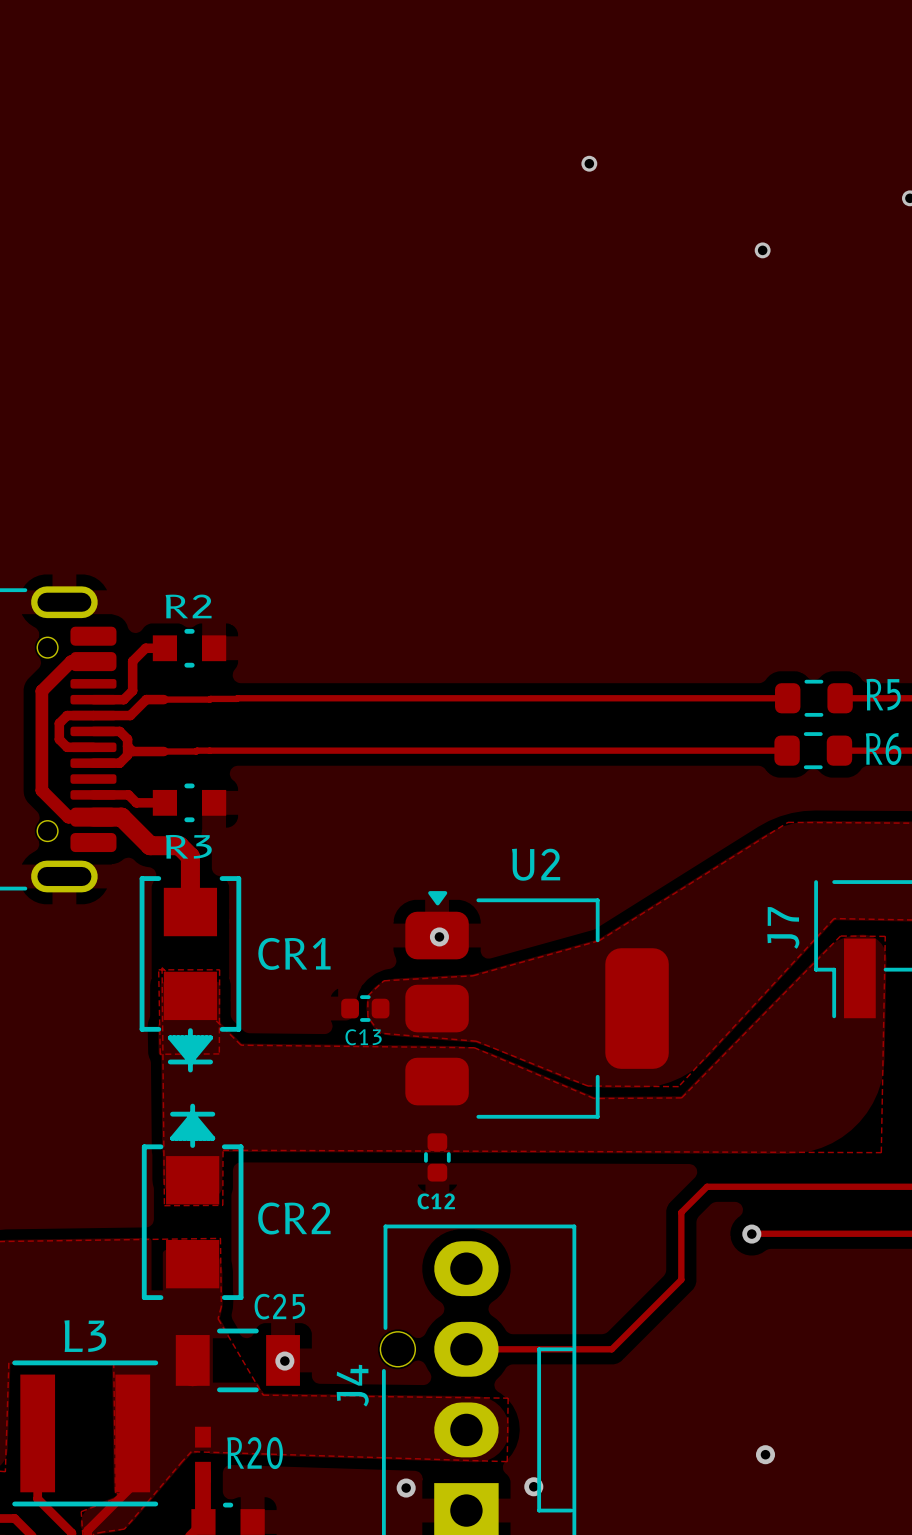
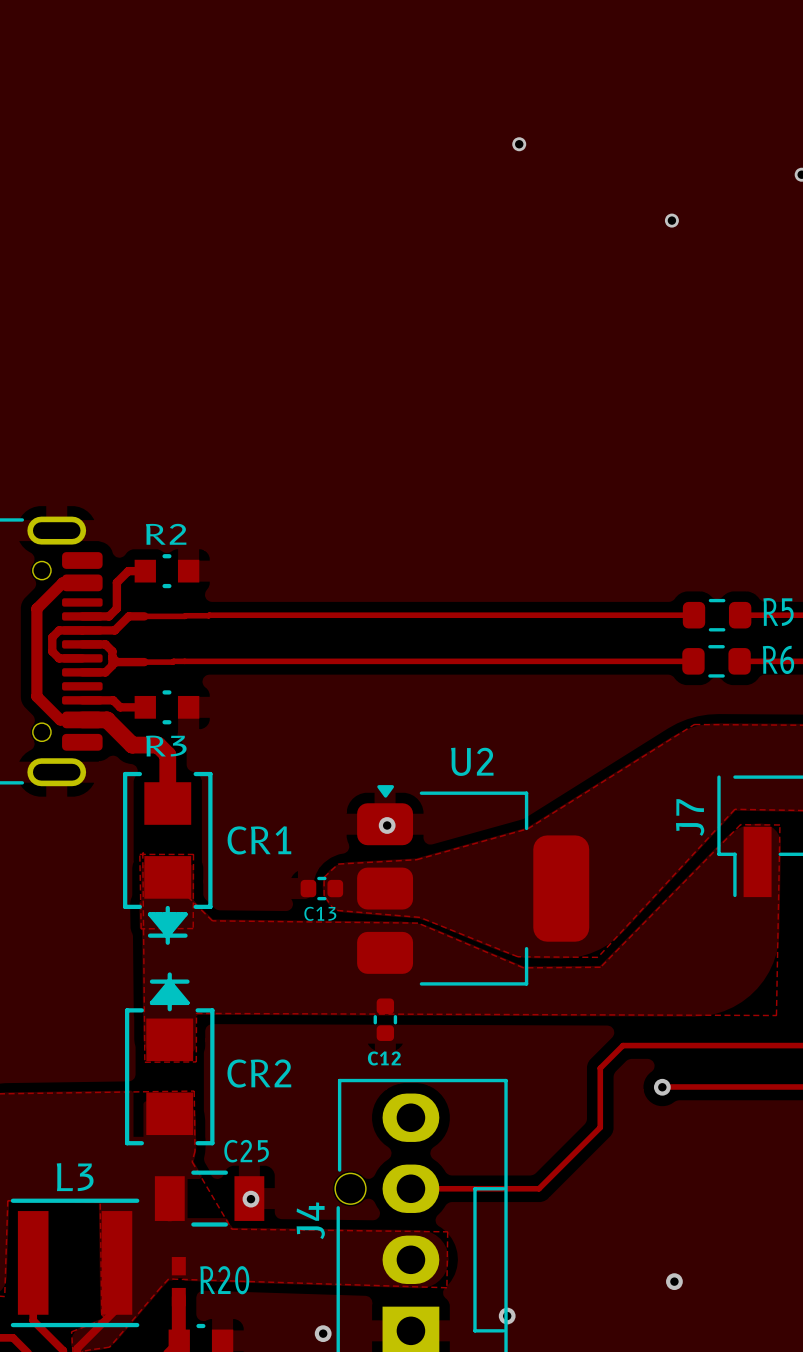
via position: (533, 1486) -> (507, 1316)
via: (406, 1488) -> none
via: none -> (323, 1333)

